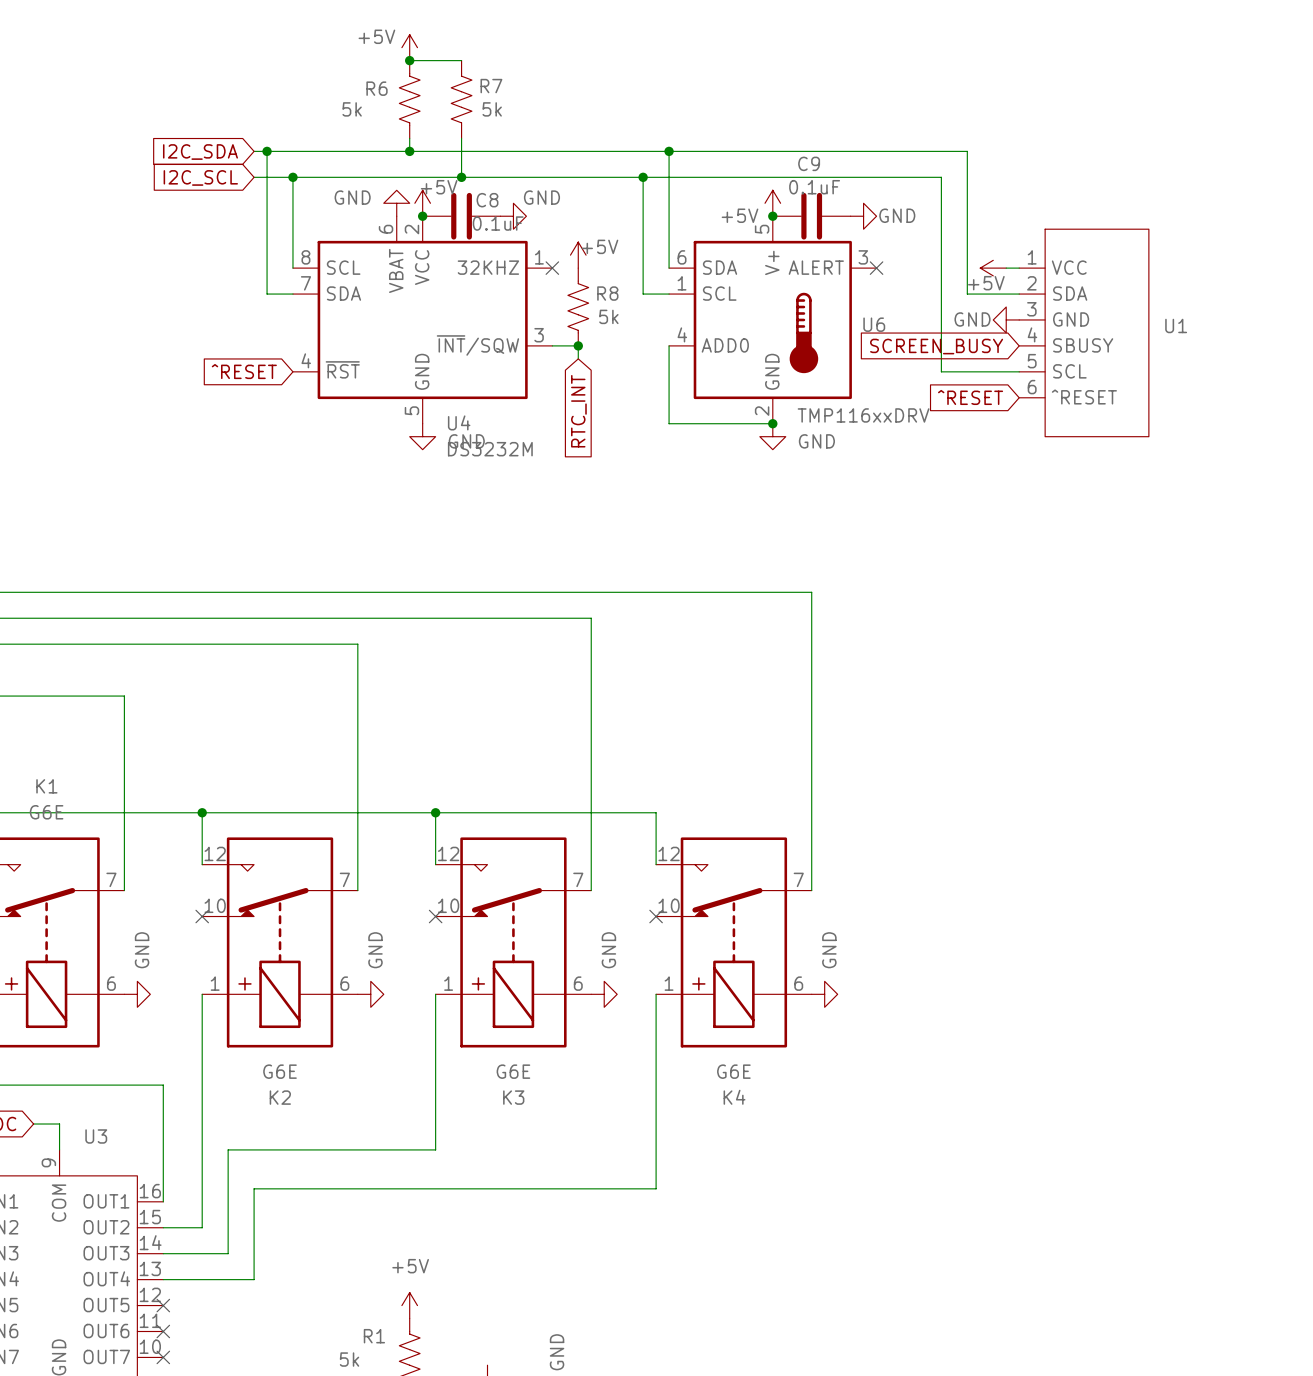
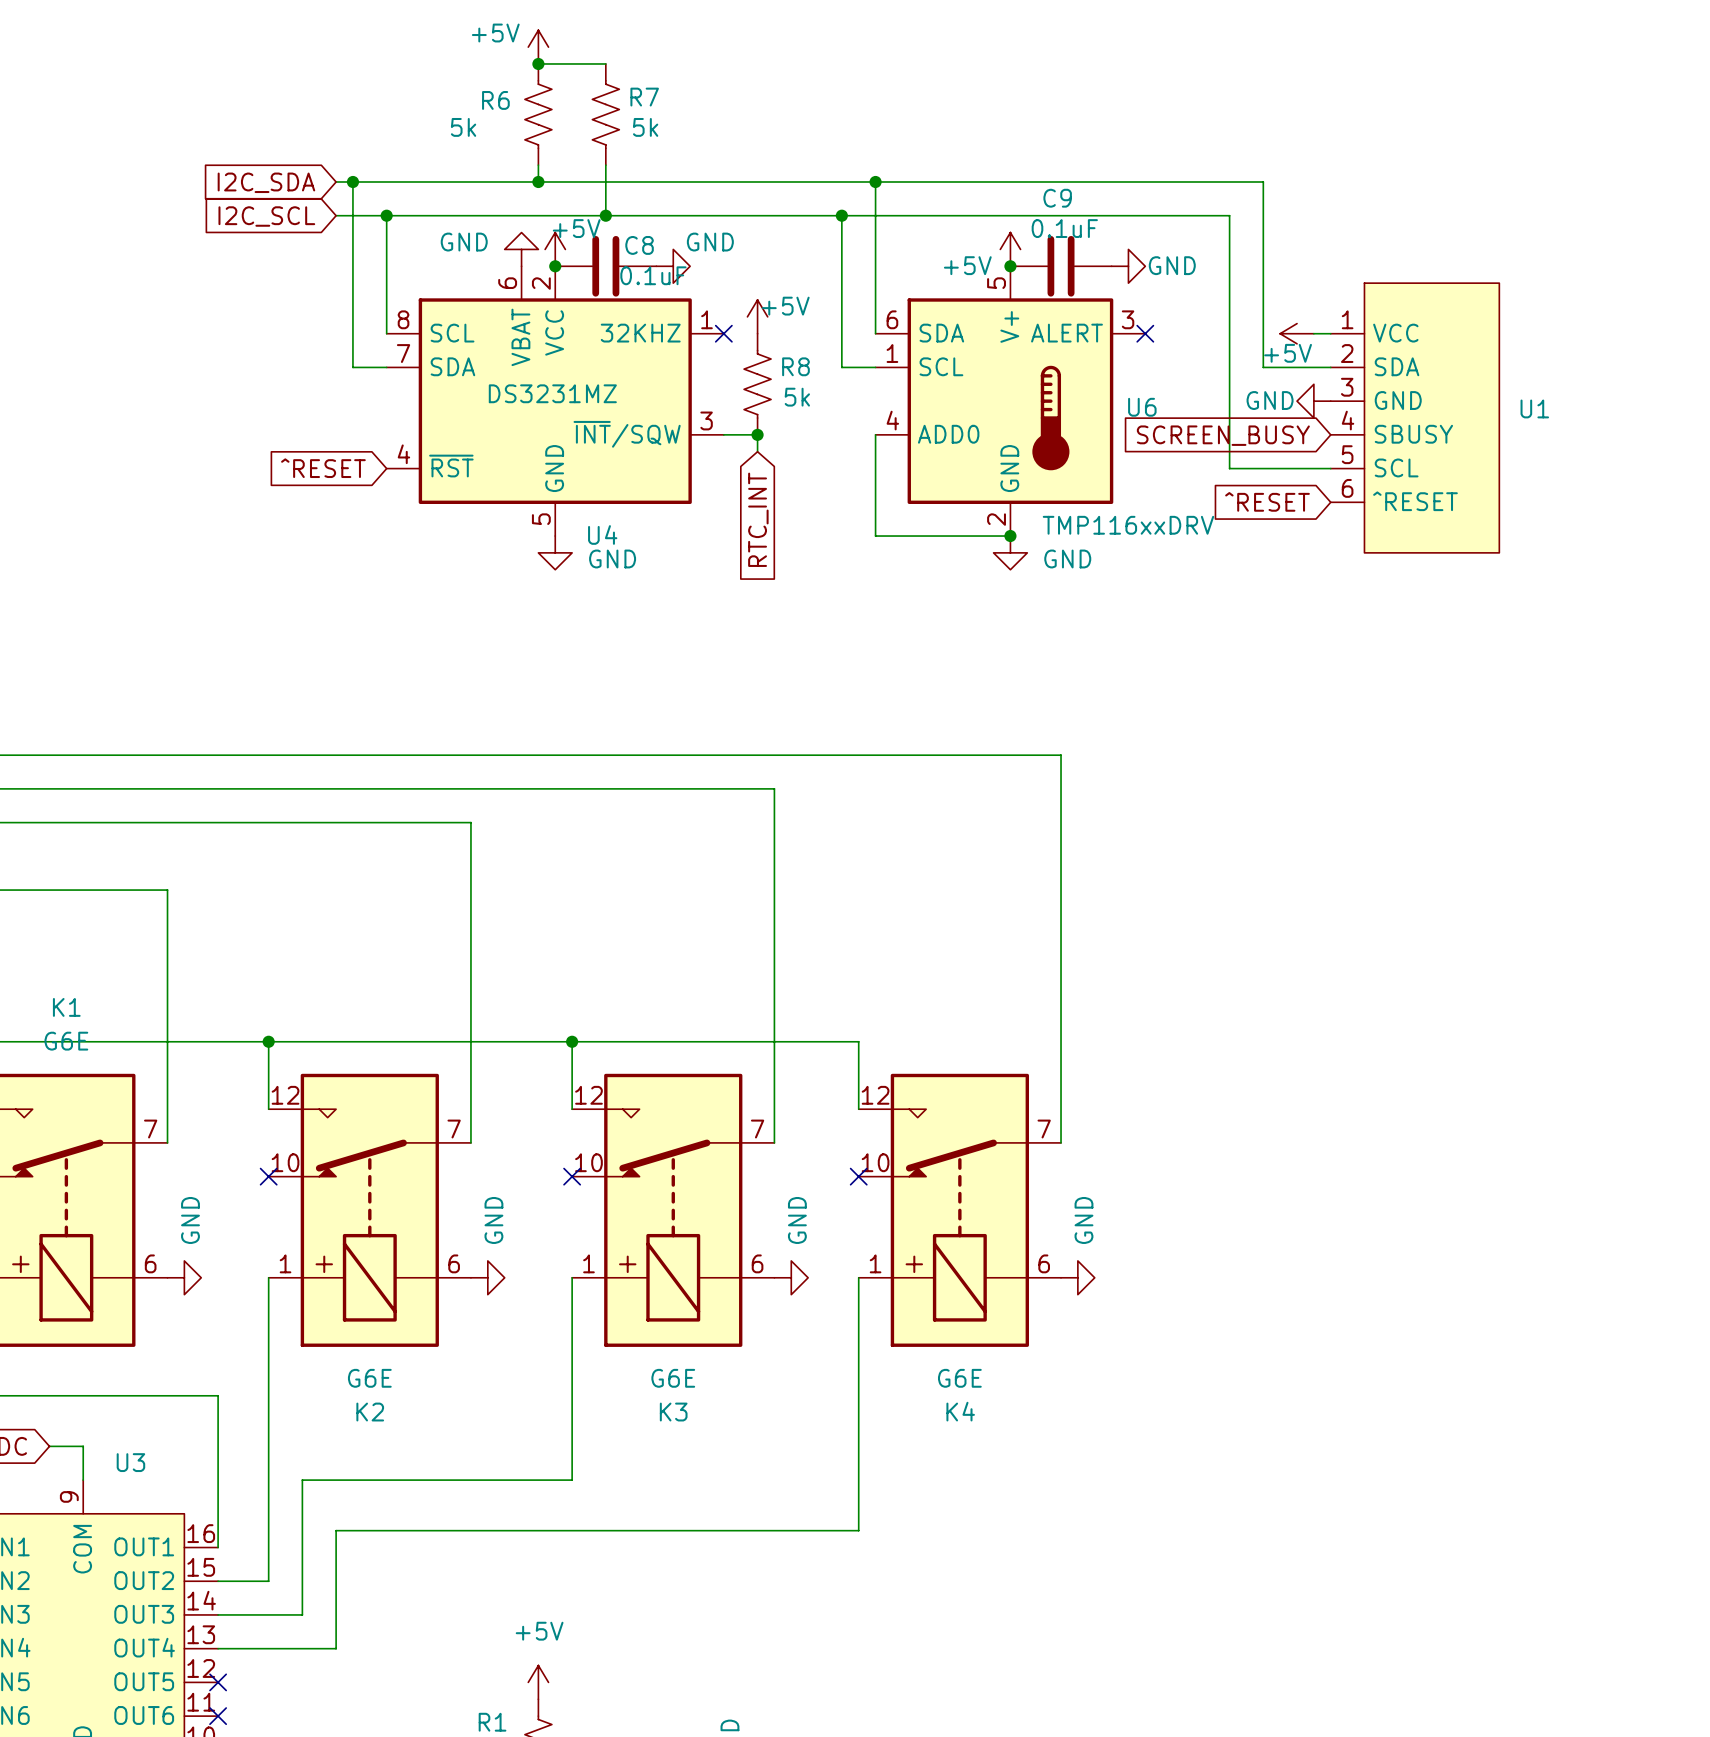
U4 value: DS3232M (490, 449) -> DS3231MZ (552, 393)

